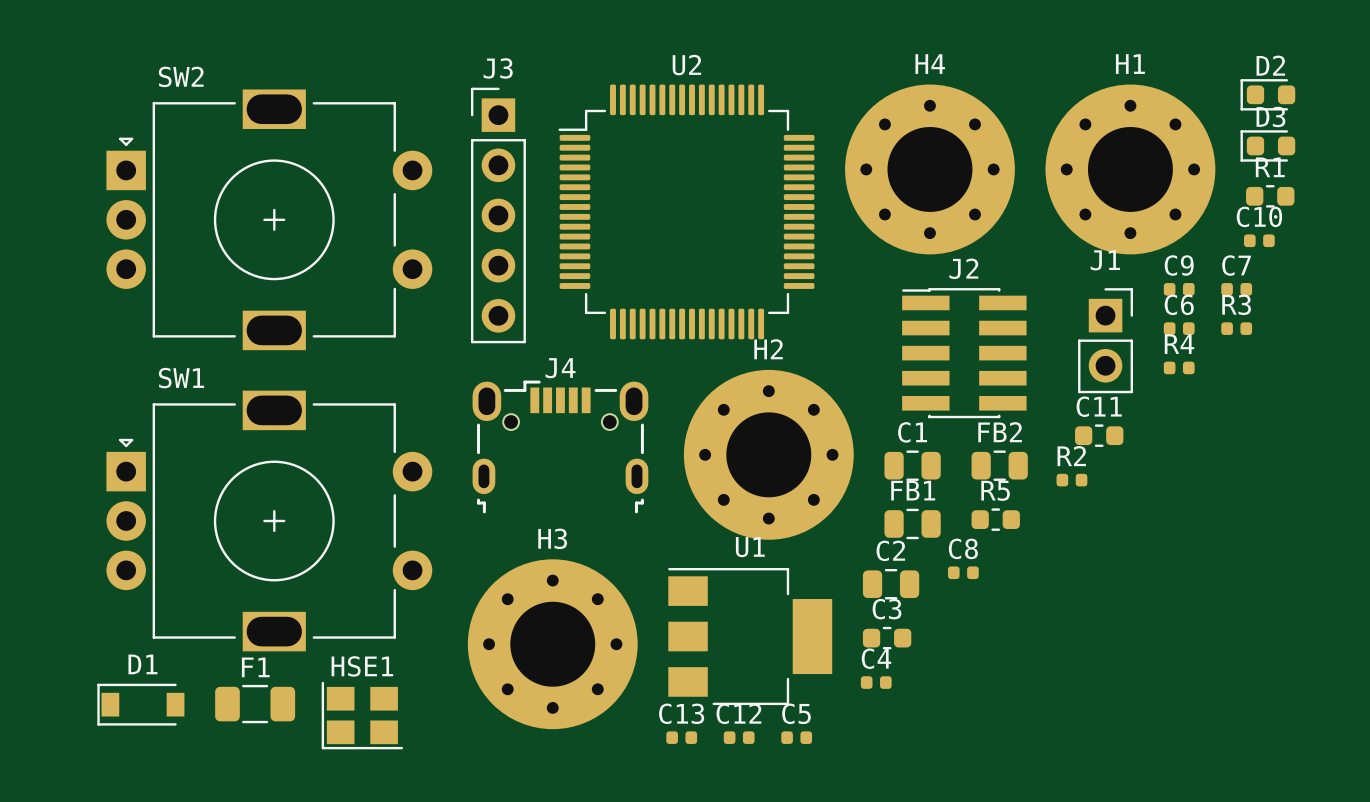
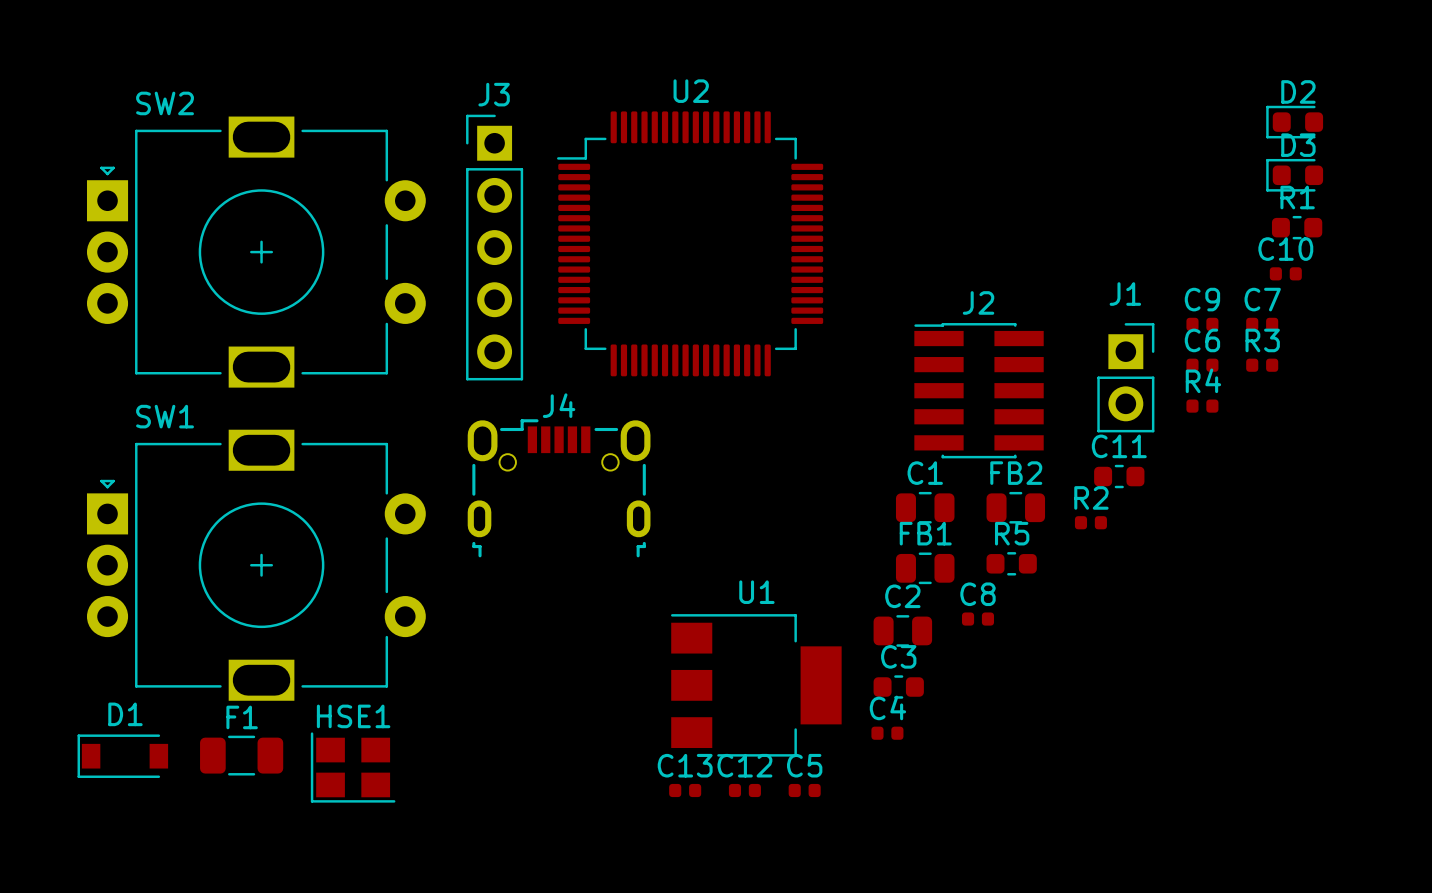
H4: (929, 169) -> none
H1: (1130, 169) -> none
H2: (768, 454) -> none
H3: (552, 644) -> none

